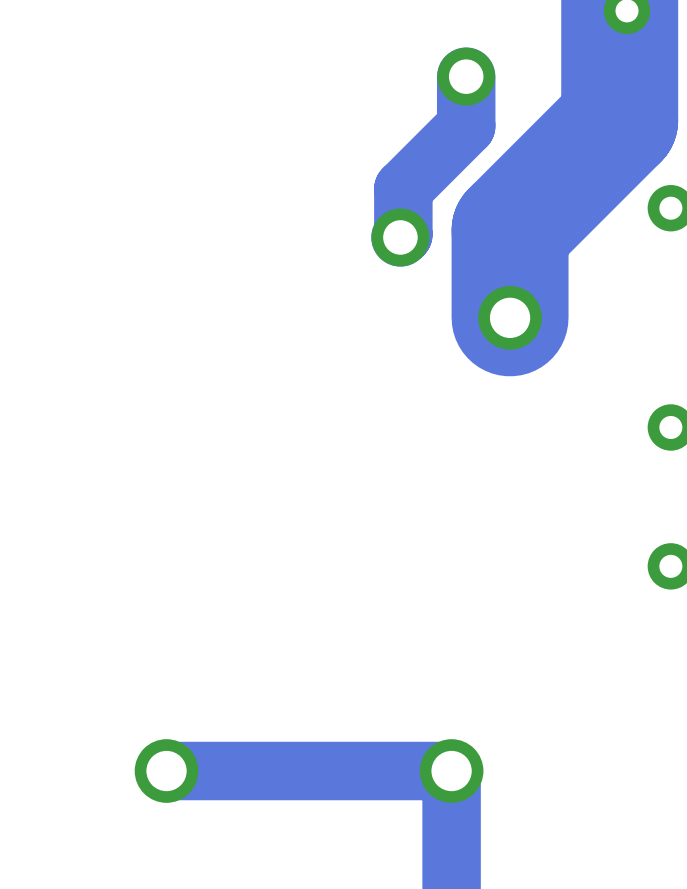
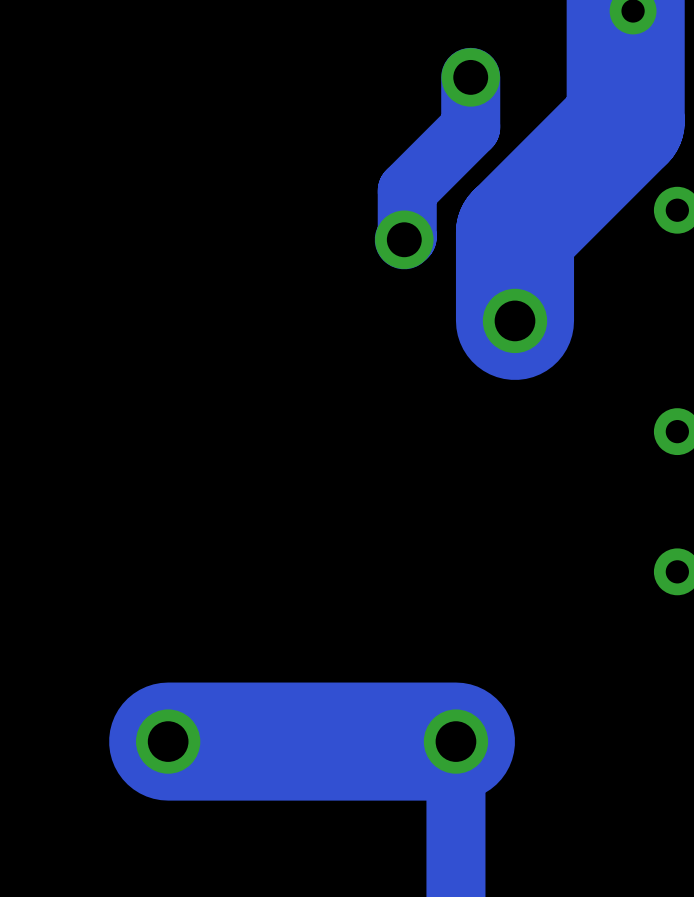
via position: (166, 771) -> (168, 741)
track: (451, 771) (166, 771) -> (455, 778) (455, 741) (168, 741)
via position: (451, 771) -> (455, 741)

